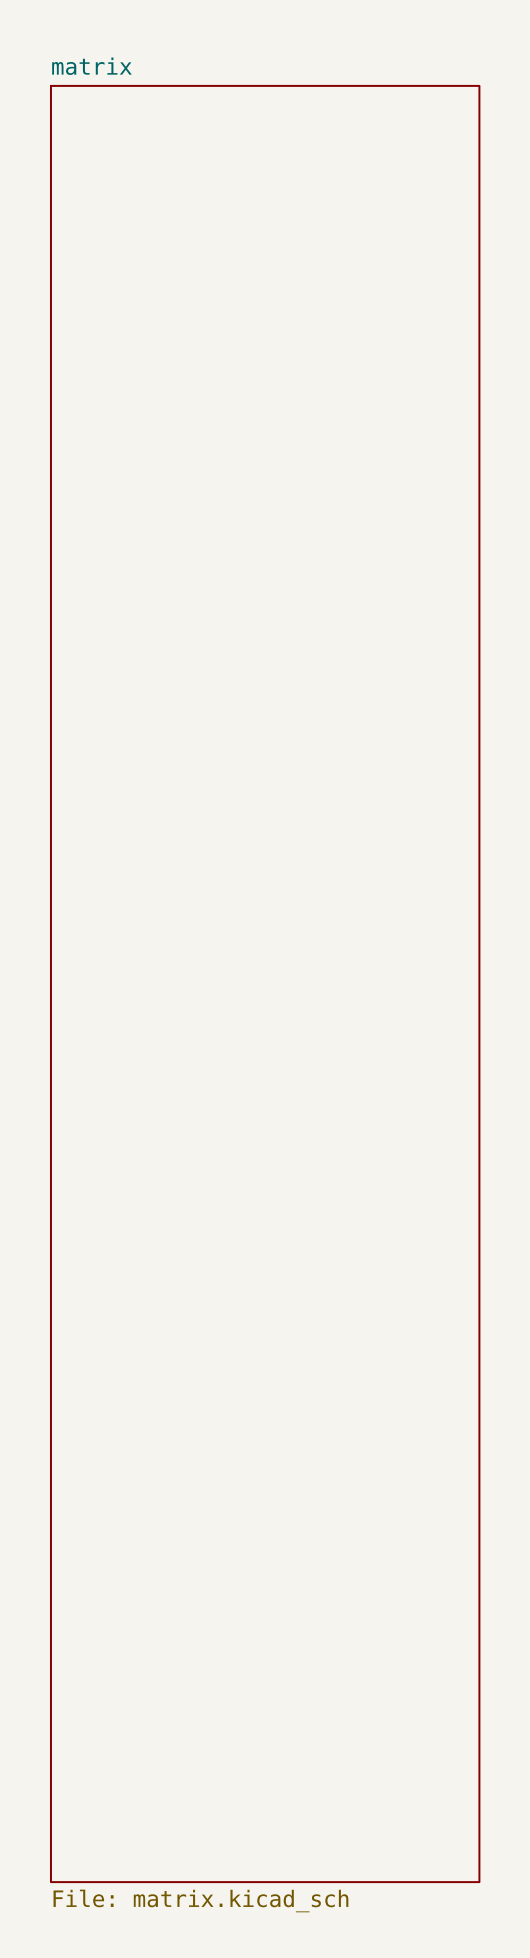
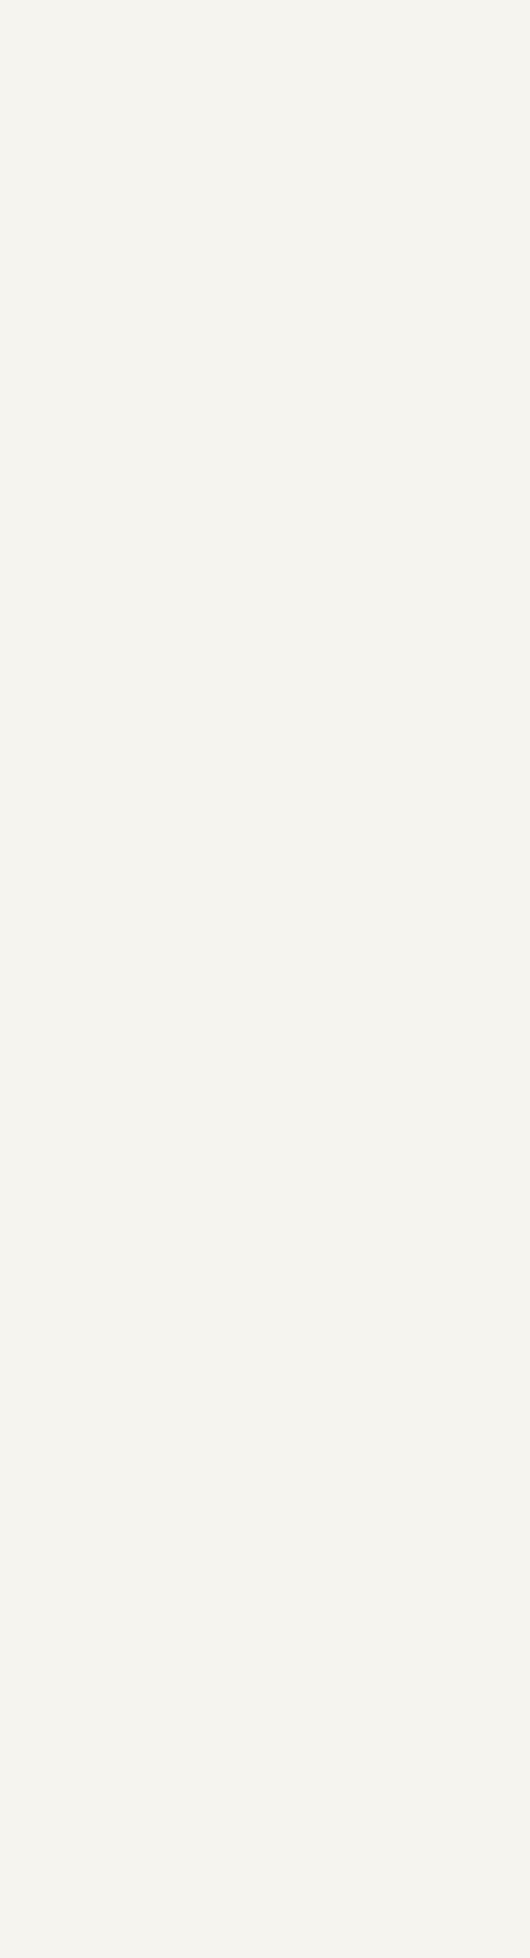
sheet matrix: File: matrix.kicad_sch (265, 984) -> none

